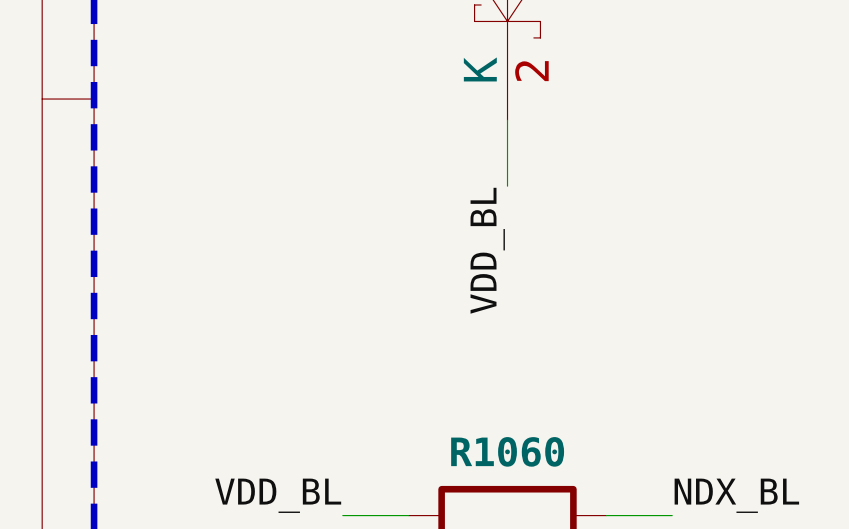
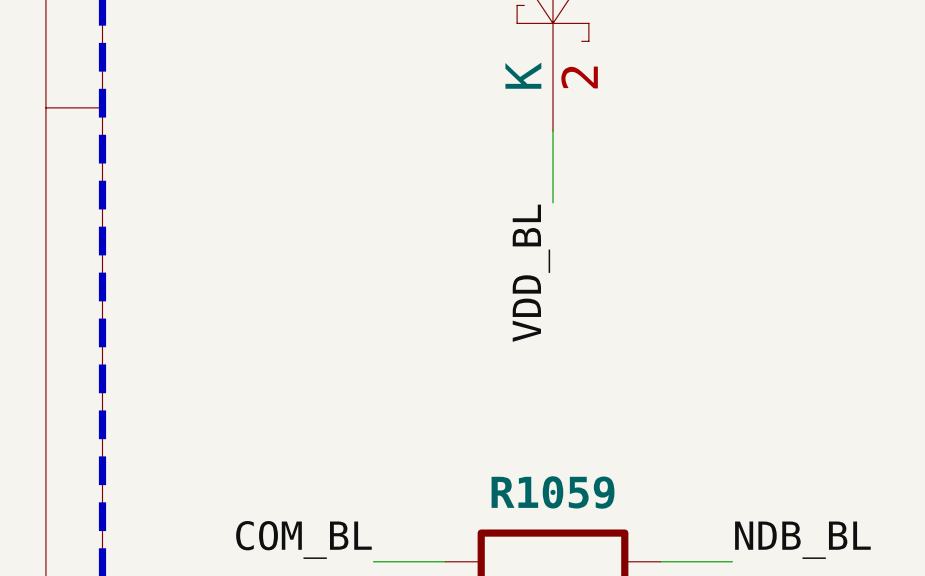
R1060 name: R1060 (507, 451) -> R1059 (553, 492)
label: VDD_BL (278, 495) -> COM_BL (303, 539)
label: NDX_BL (736, 495) -> NDB_BL (802, 540)

